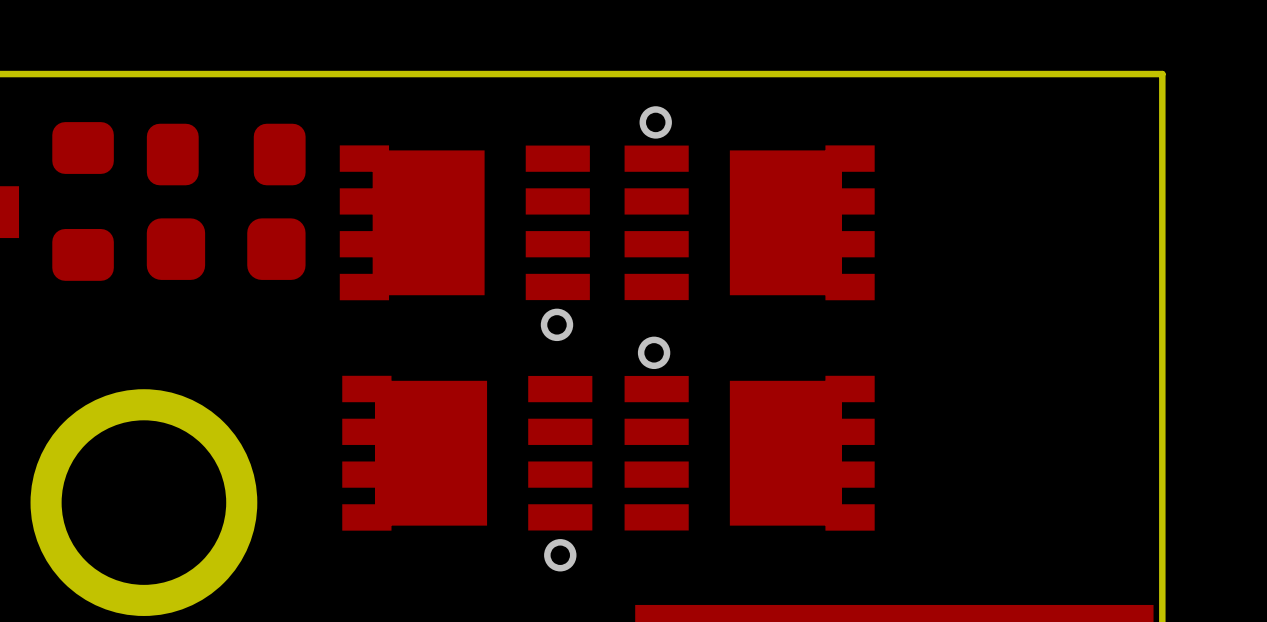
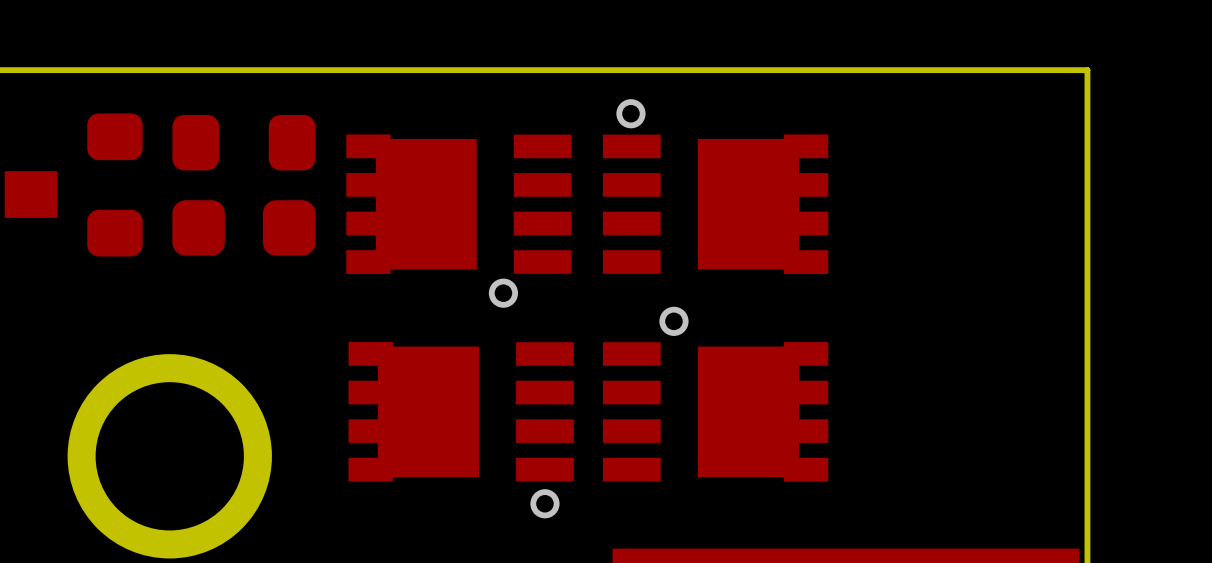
via position: (556, 324) -> (503, 293)
via position: (654, 352) -> (673, 321)

